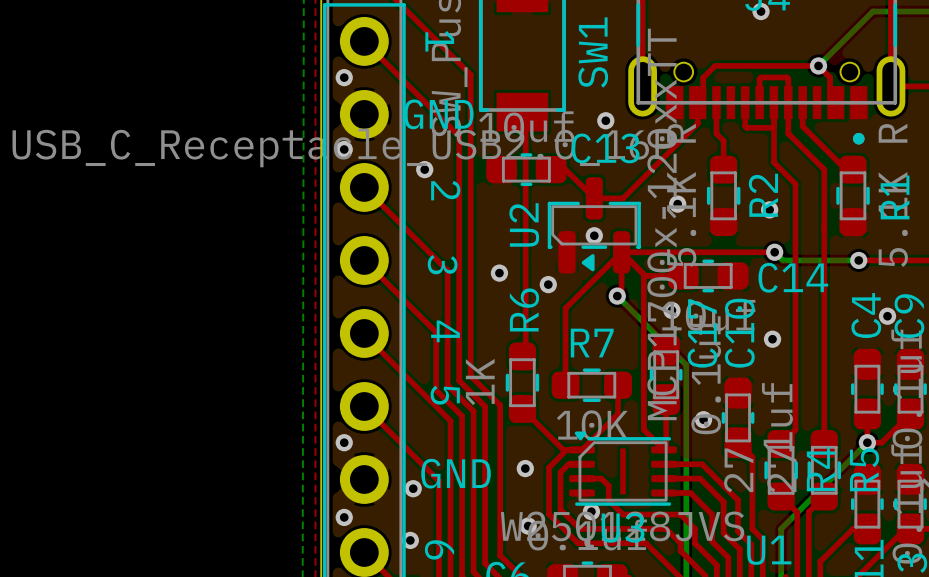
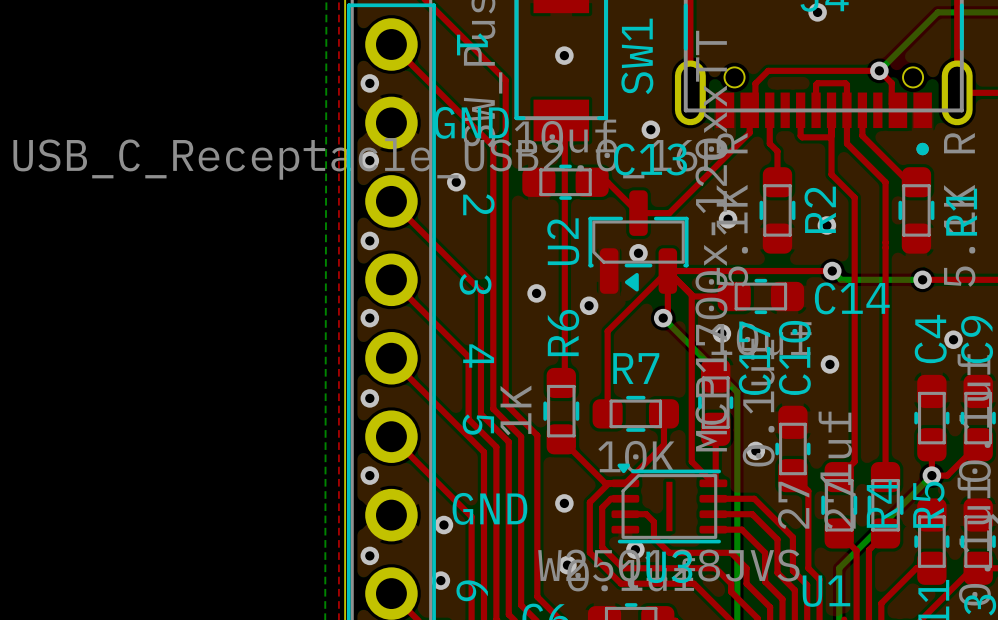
via: none -> (564, 55)
via: none -> (369, 240)
via: none -> (369, 318)
via: none -> (369, 398)

